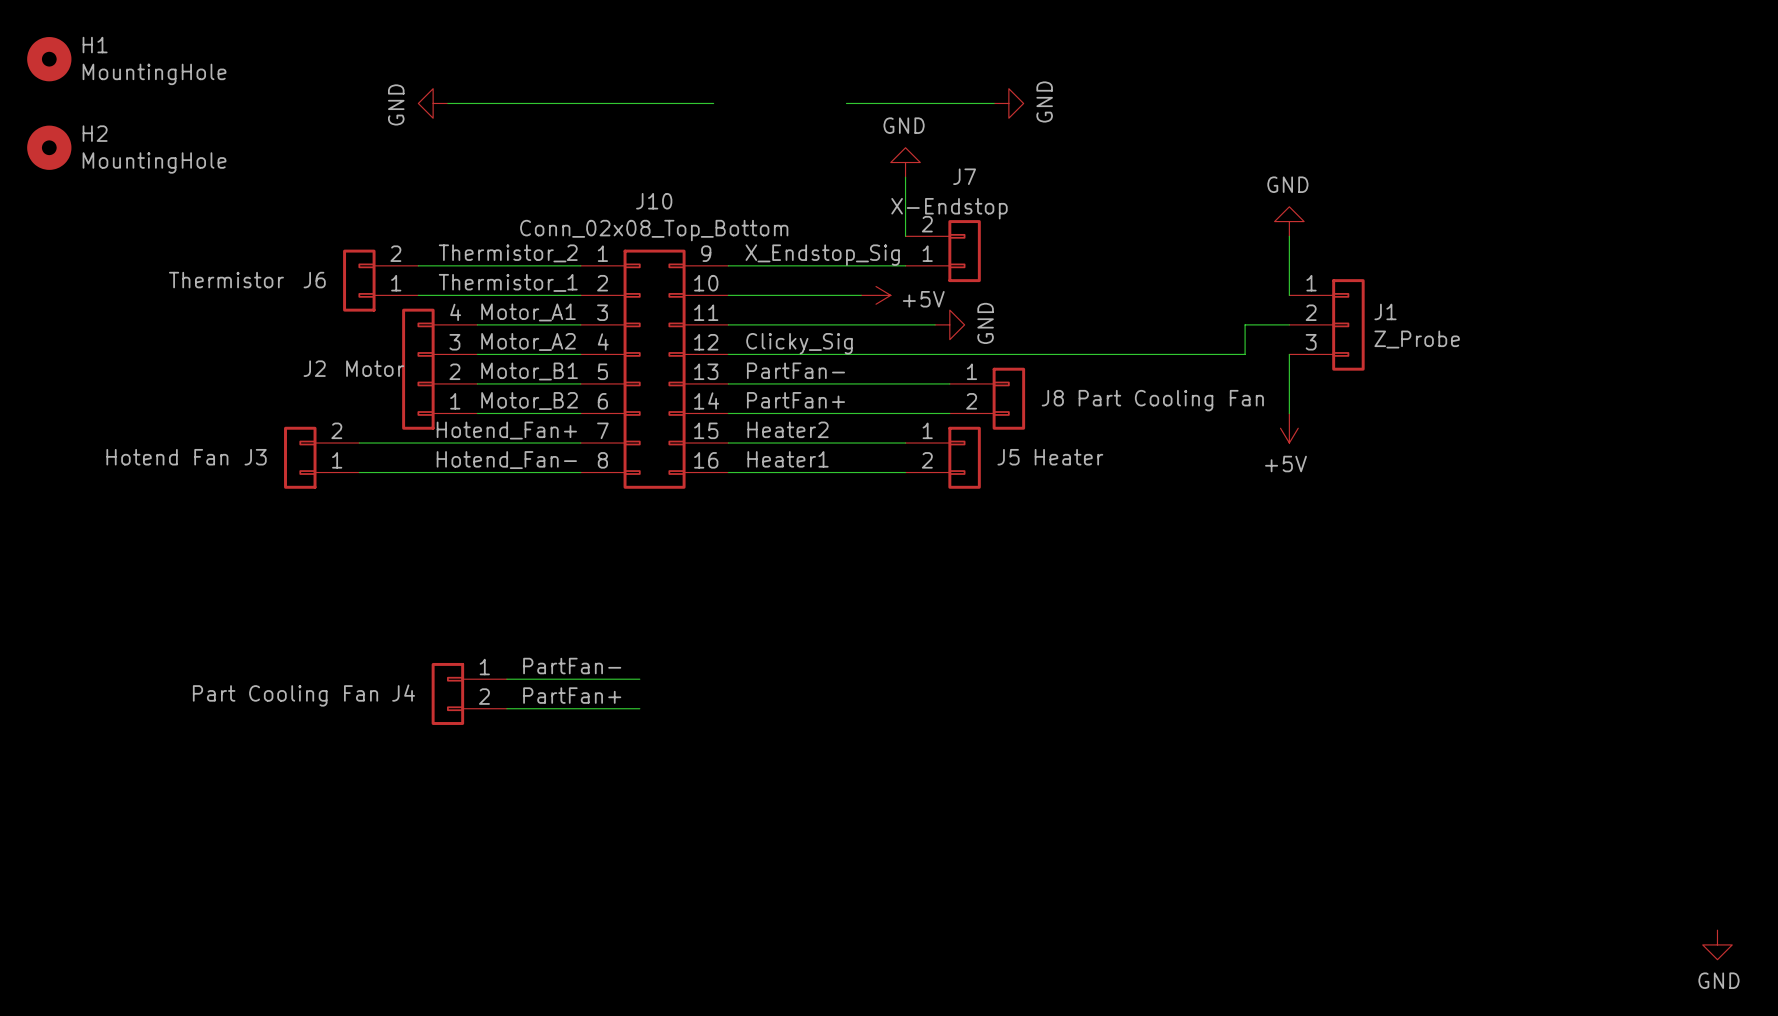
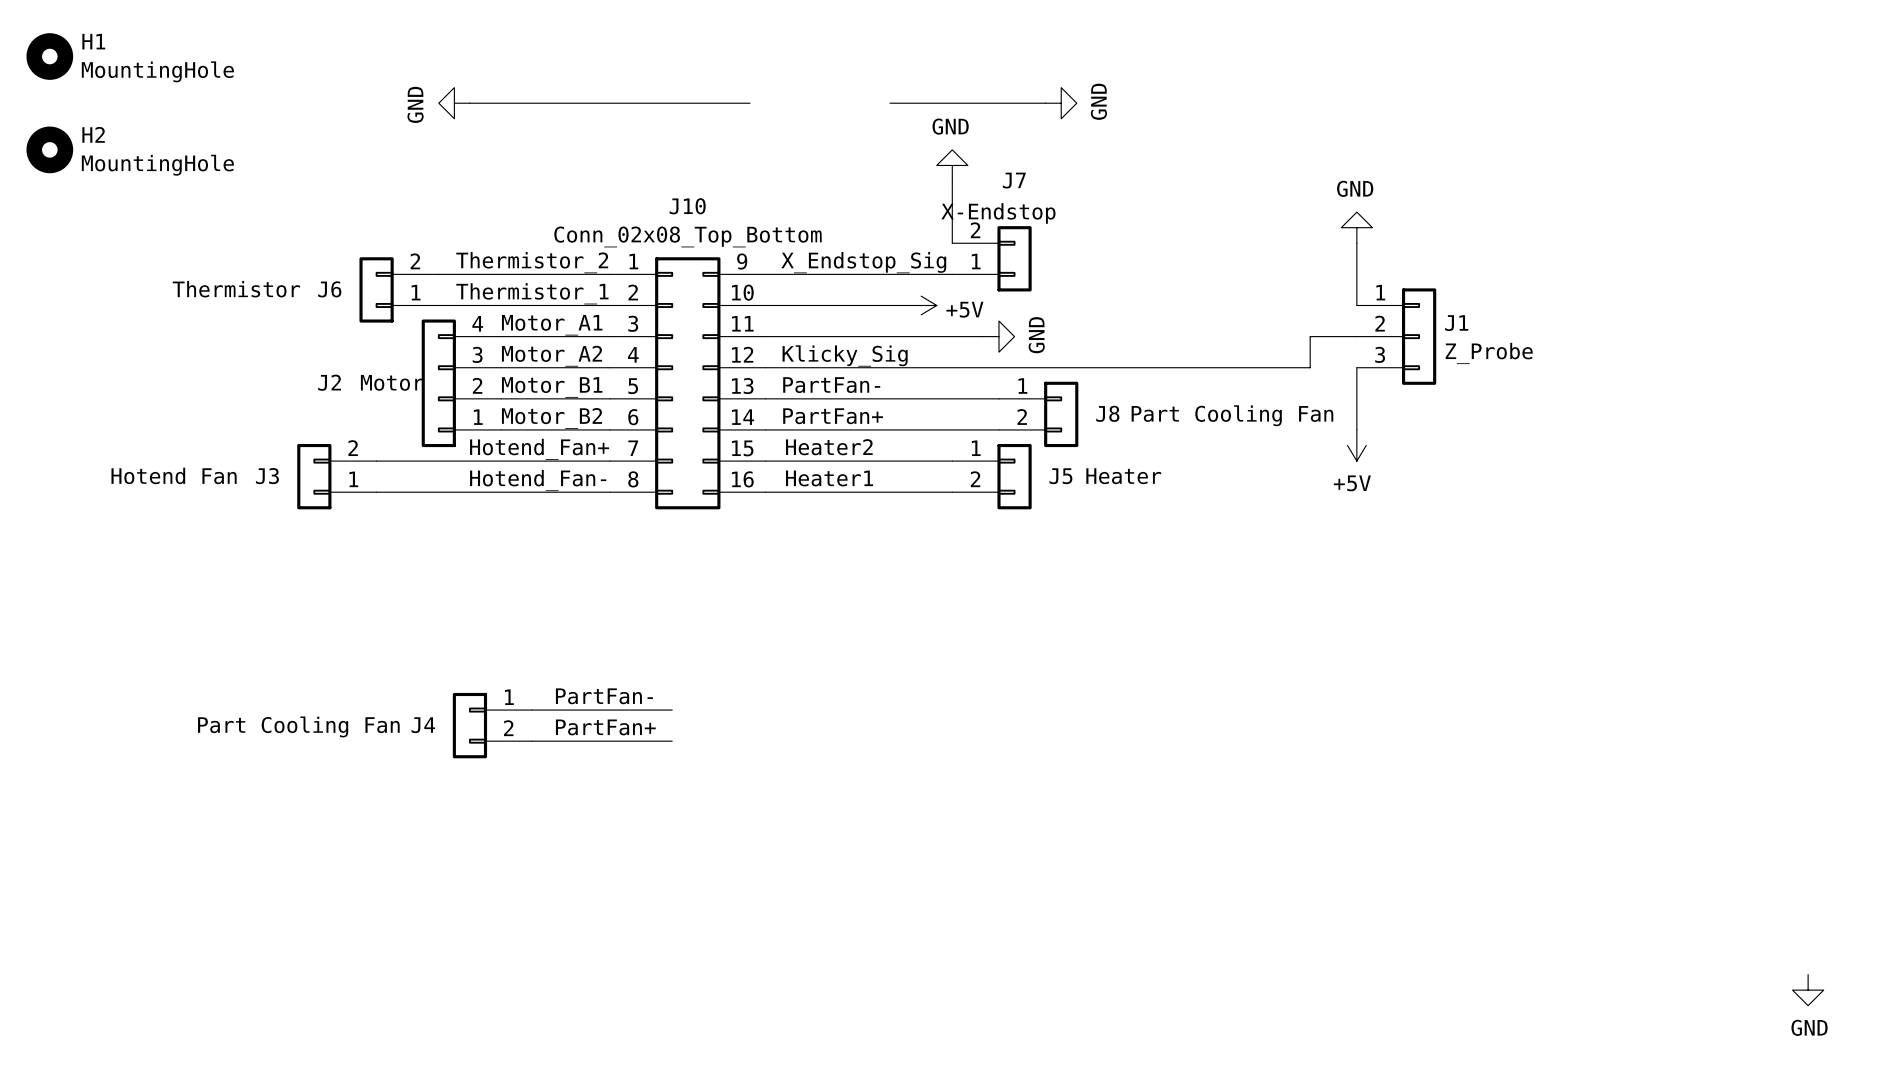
label: Clicky_Sig (799, 343) -> Klicky_Sig (845, 355)

